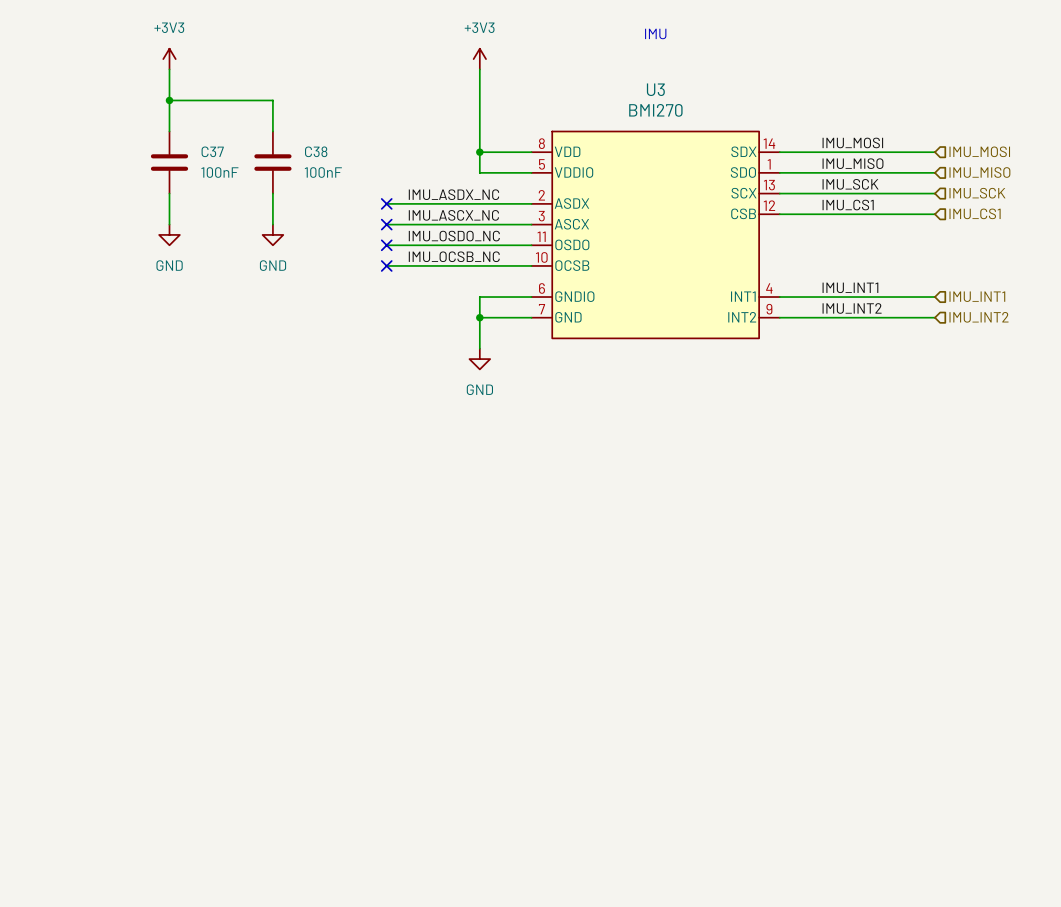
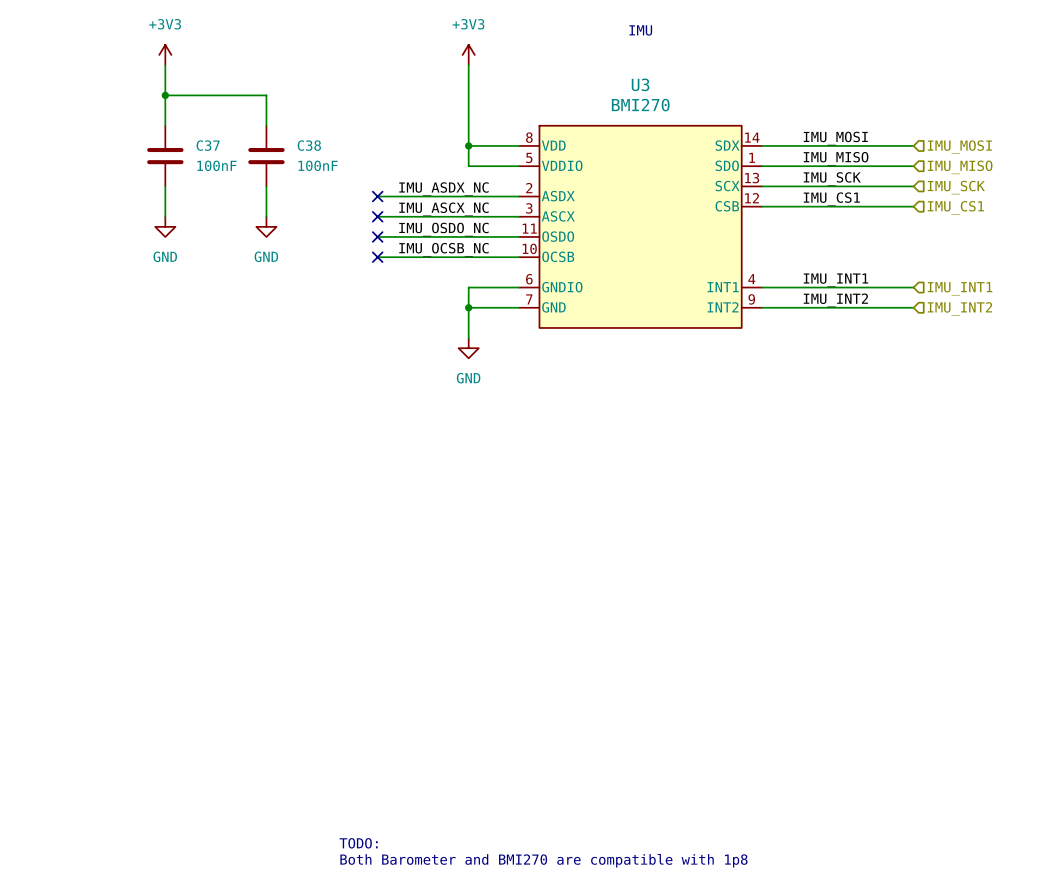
text: none -> TODO: (358, 843)
text: none -> Both Barometer and BMI270 are compatible with 1p8 (543, 860)

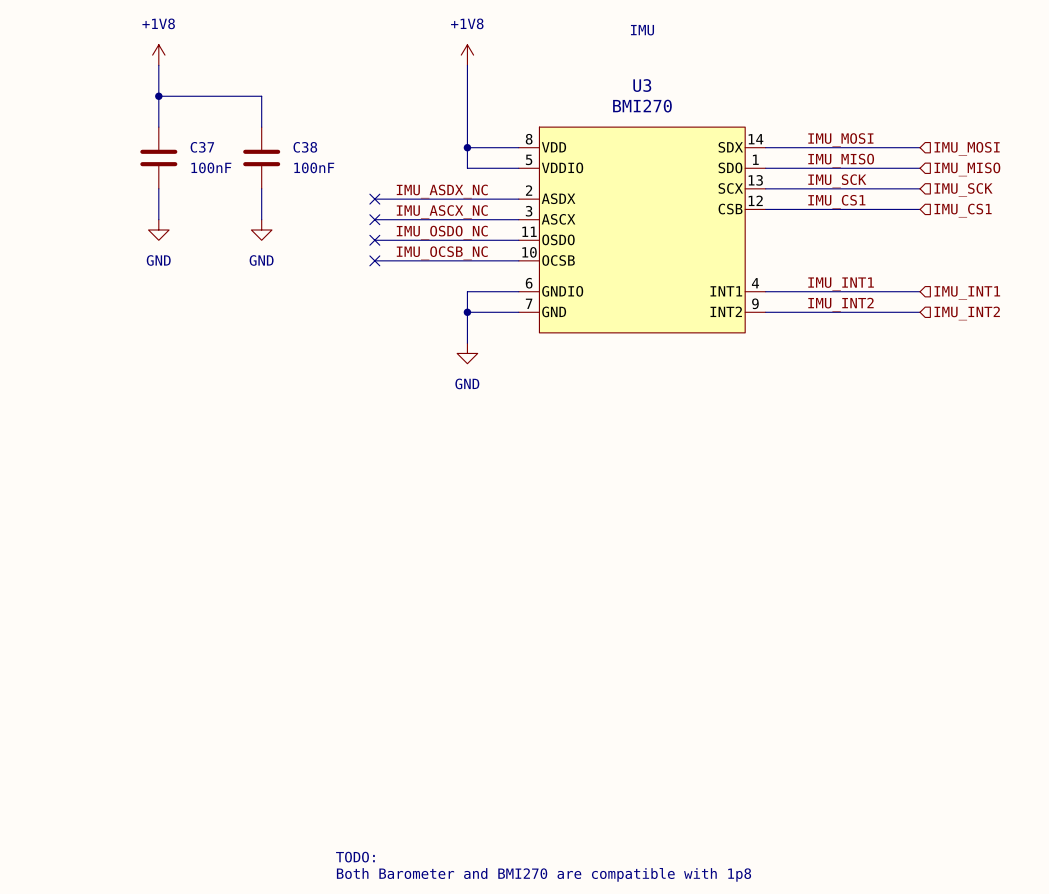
power symbol: +3V3 (165, 54) -> +1V8 (158, 55)
power symbol: +3V3 (468, 54) -> +1V8 (467, 55)

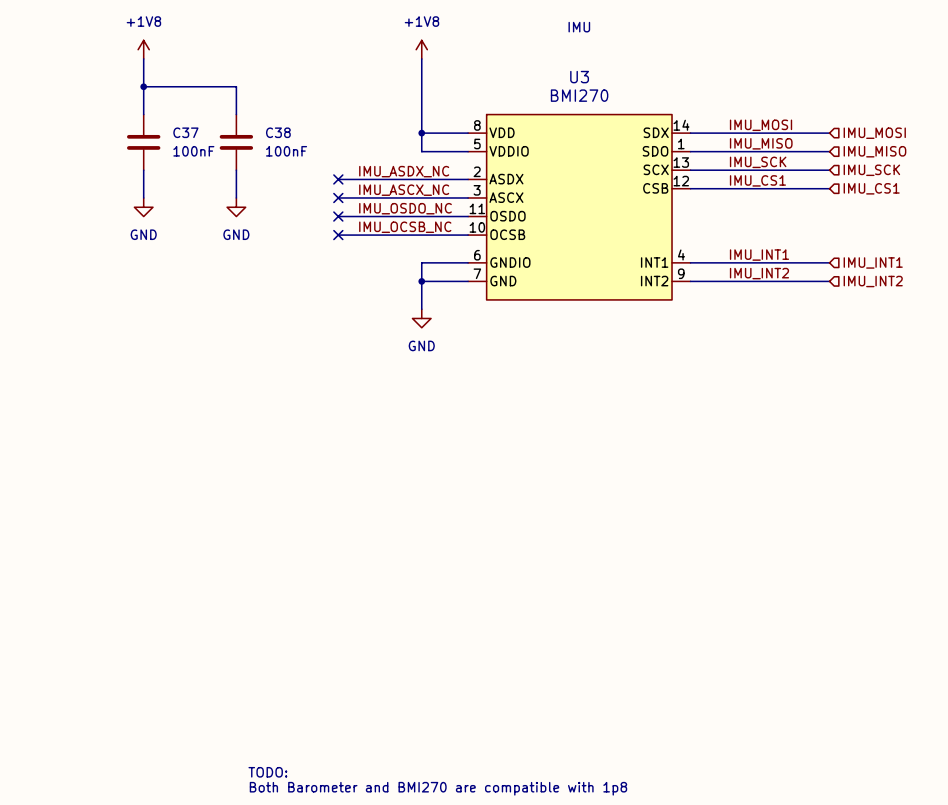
text position: TODO: (355, 857) -> TODO: (267, 772)
text position: Both Barometer and BMI270 are compatible with 1p8 (544, 874) -> Both Barometer and BMI270 are compatible with 1p8 (438, 788)

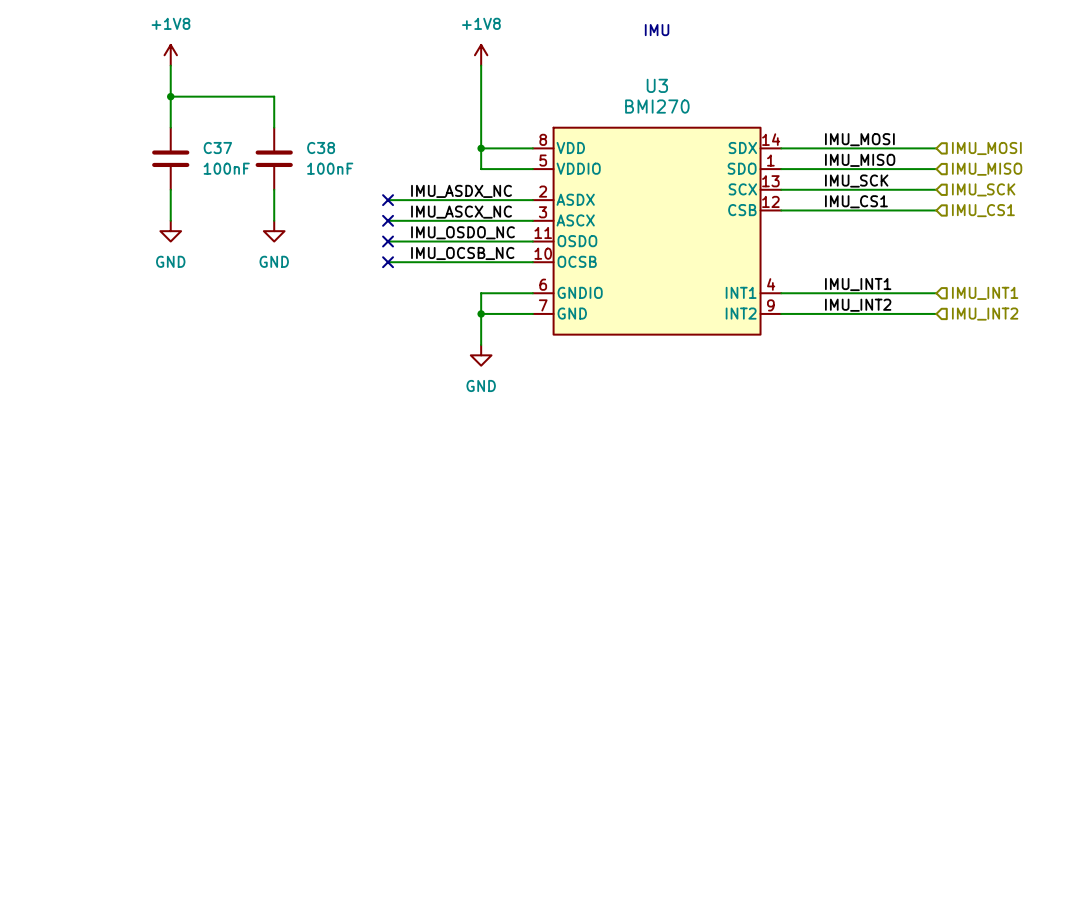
text: TODO: (267, 772) -> none
text: Both Barometer and BMI270 are compatible with 1p8 (438, 788) -> none

